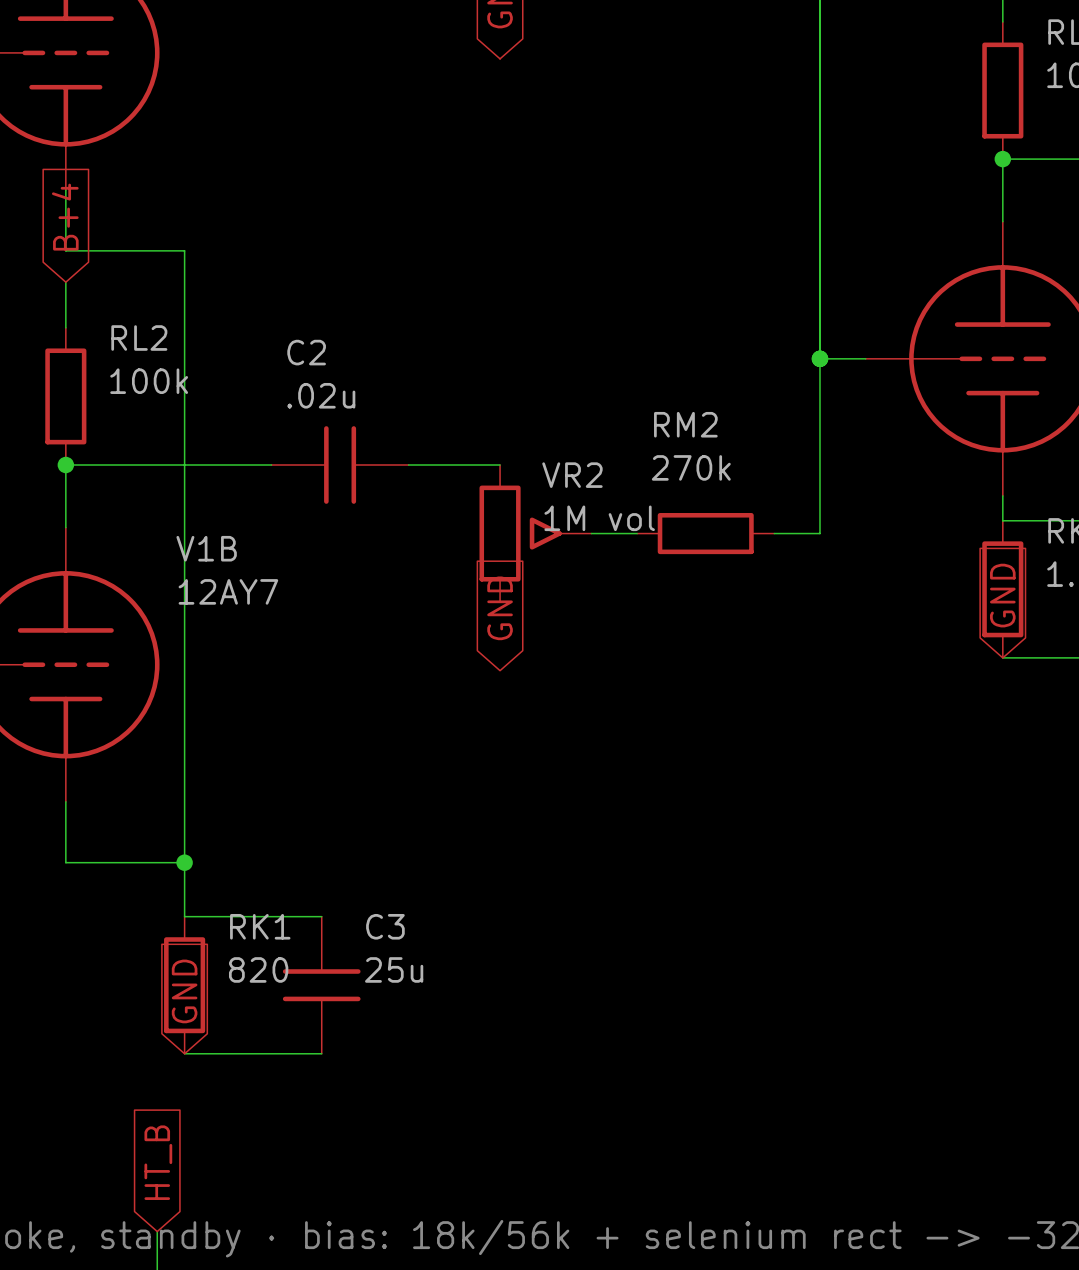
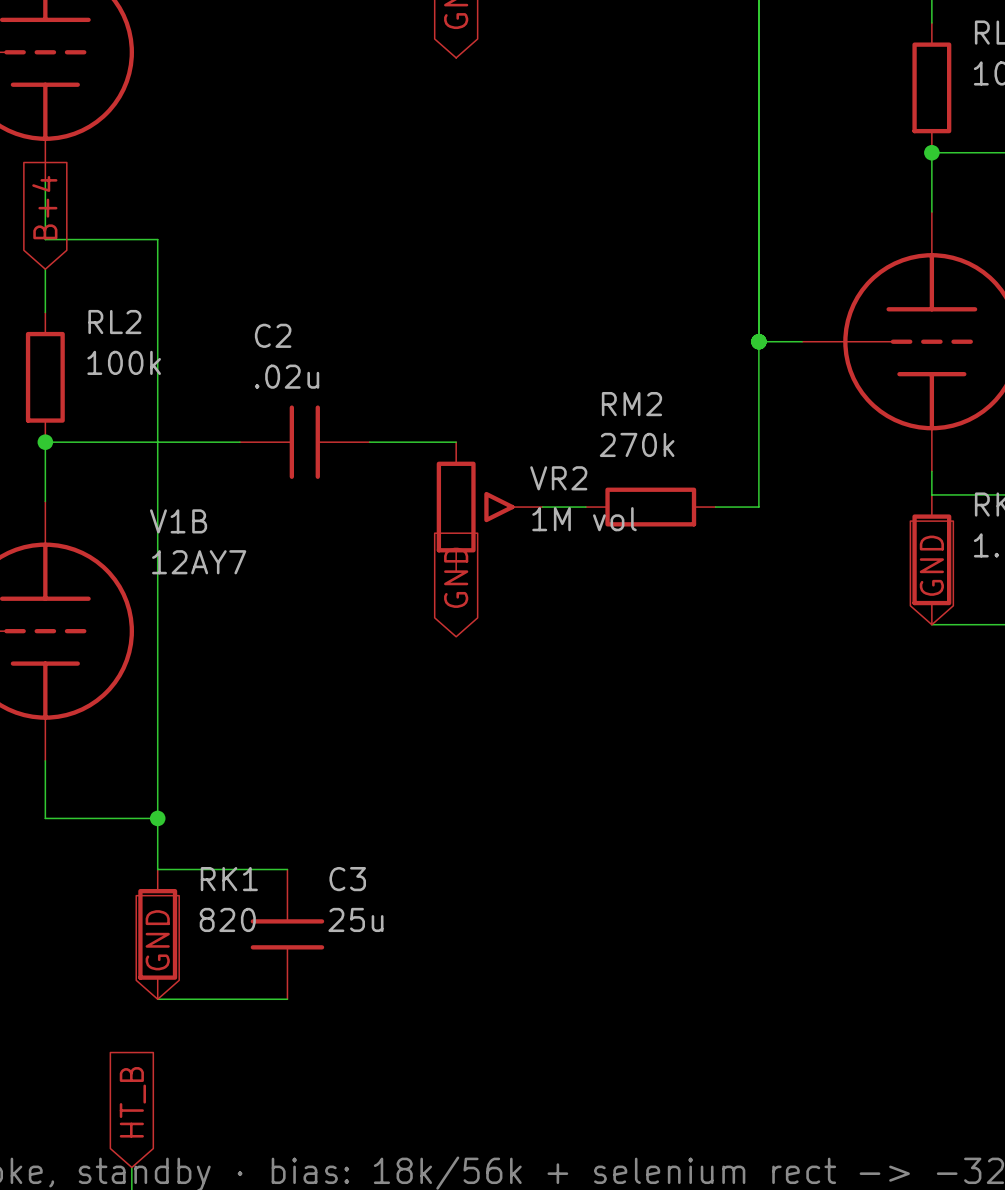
VR2 name position: VR2 (572, 475) -> VR2 (558, 478)
VR2 value position: 1M vol (599, 518) -> 1M vol (584, 519)

